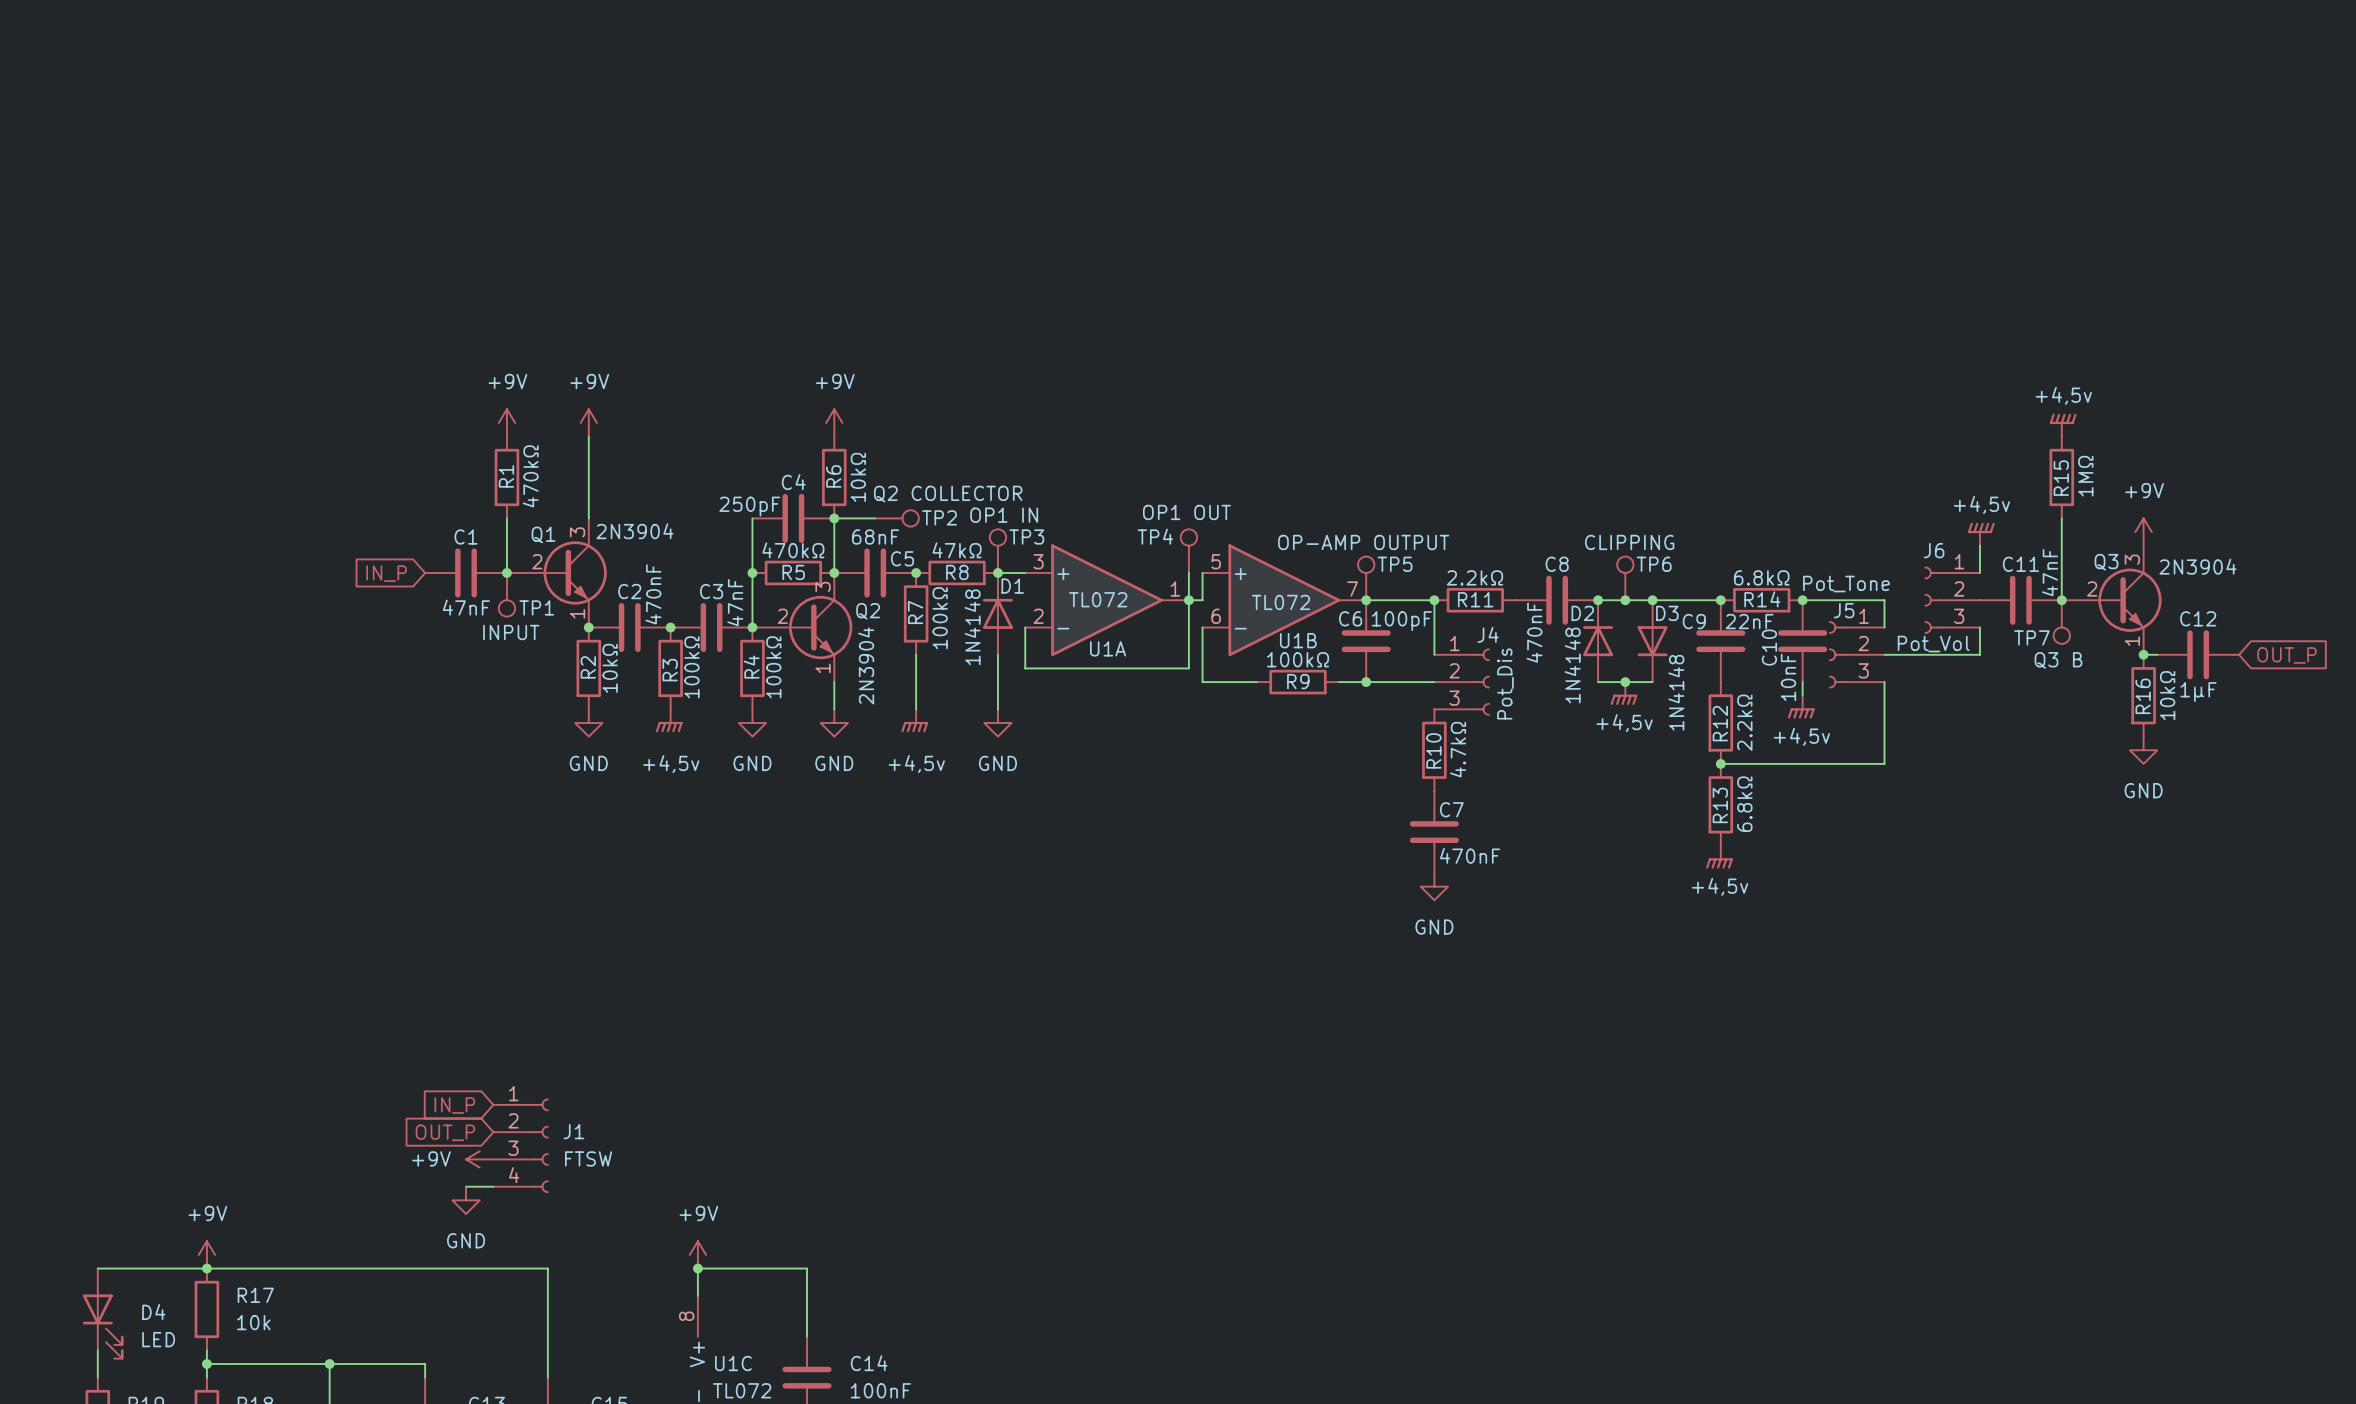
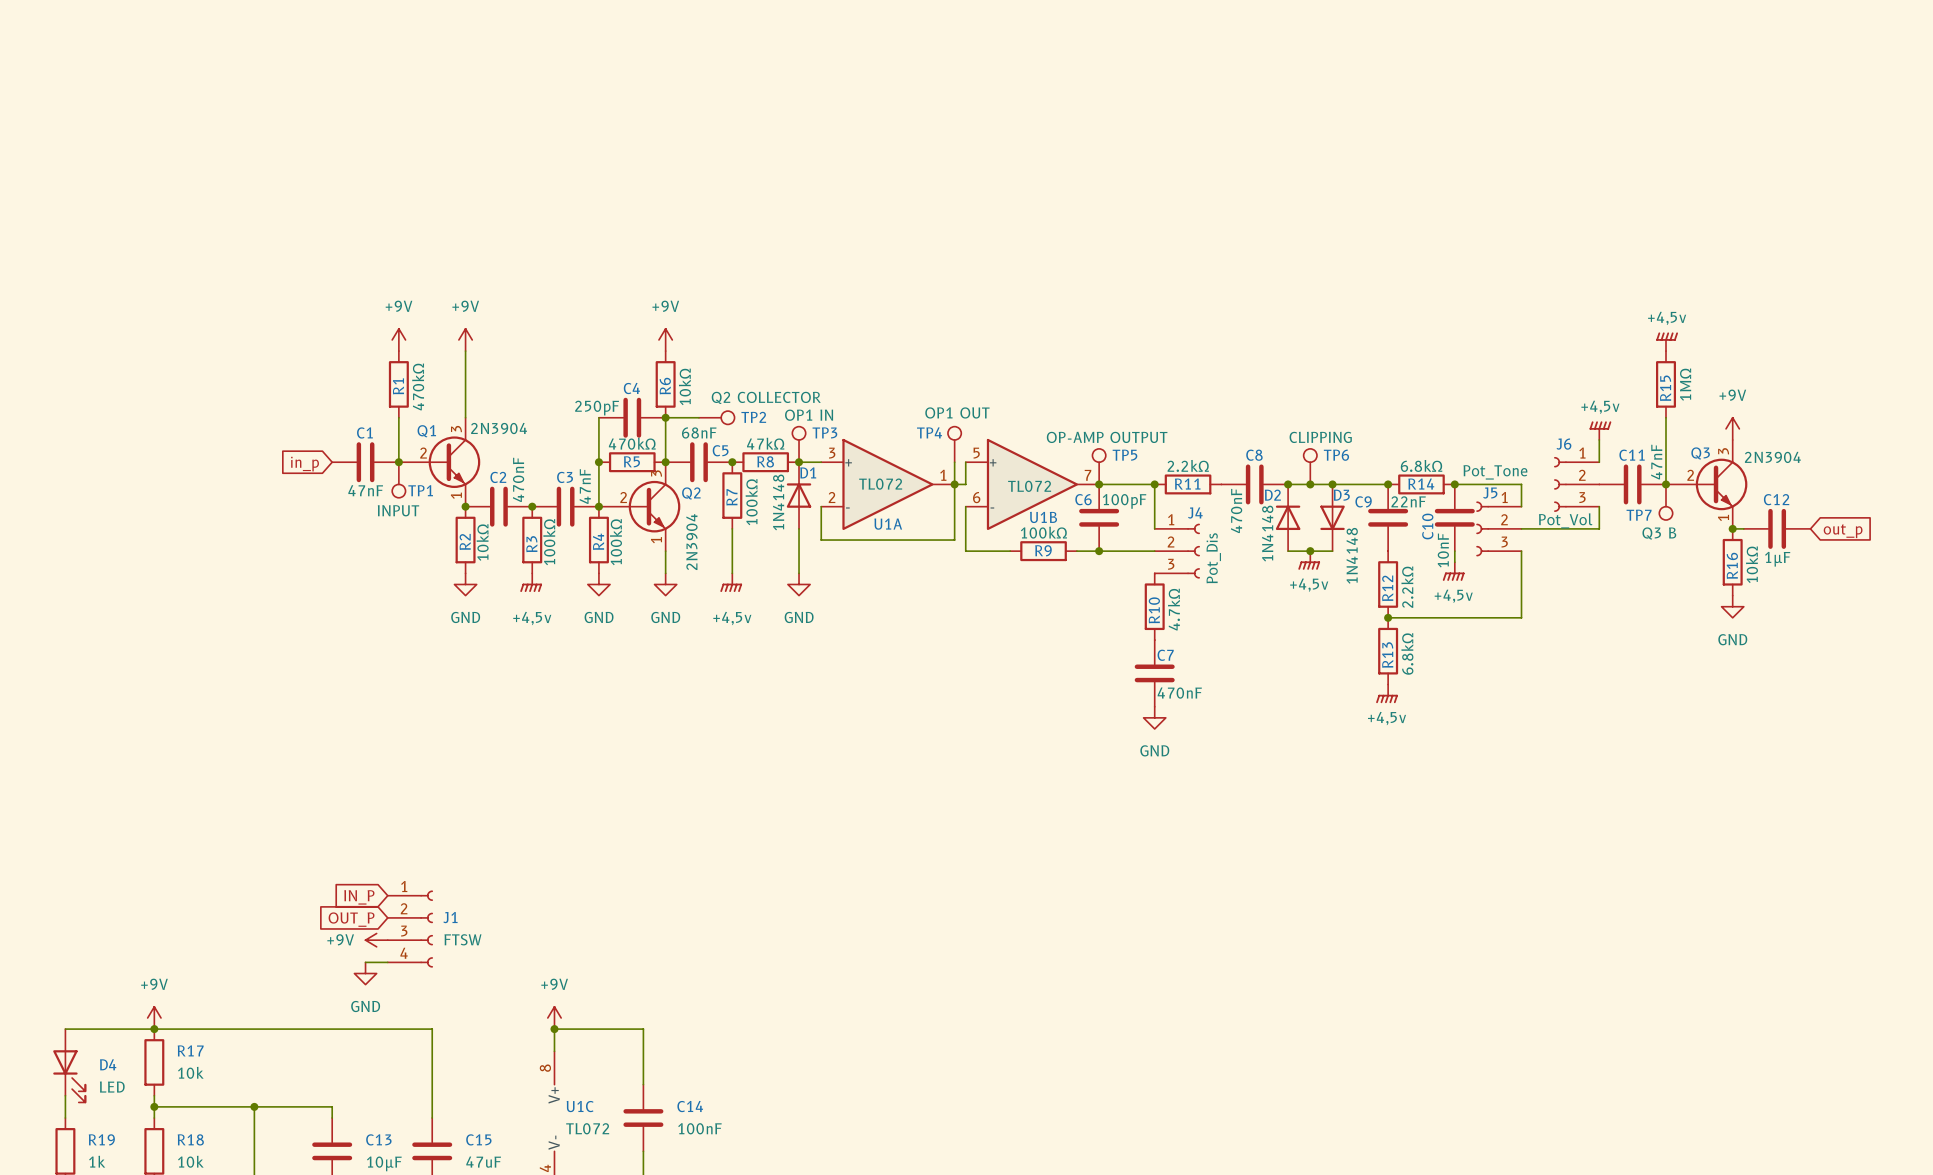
global label: IN_P (386, 573) -> in_p (305, 464)
global label: OUT_P (2287, 655) -> out_p (1843, 531)

